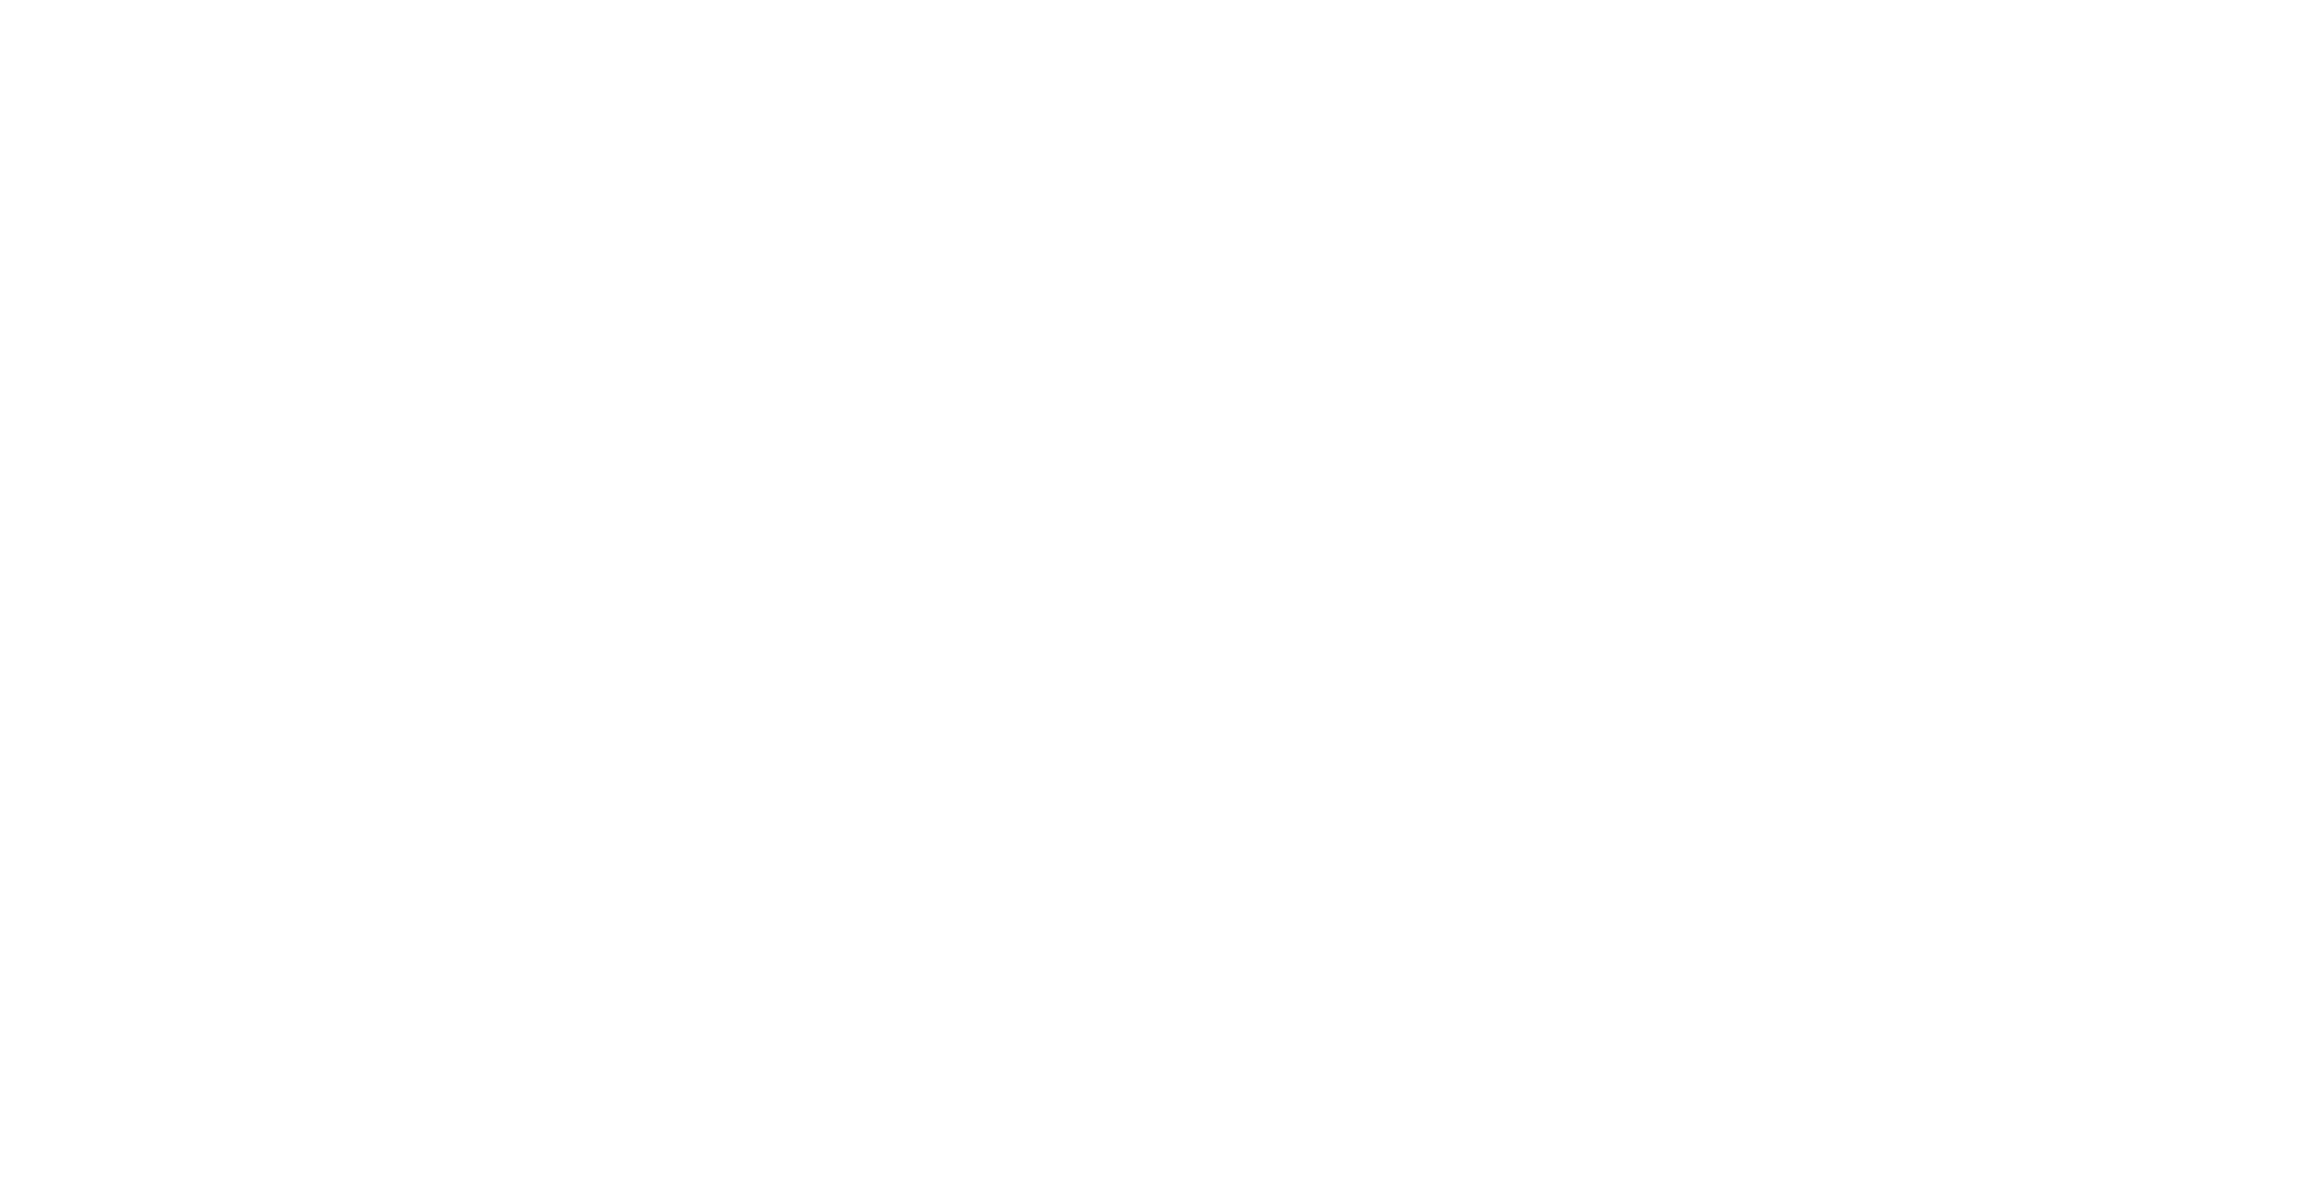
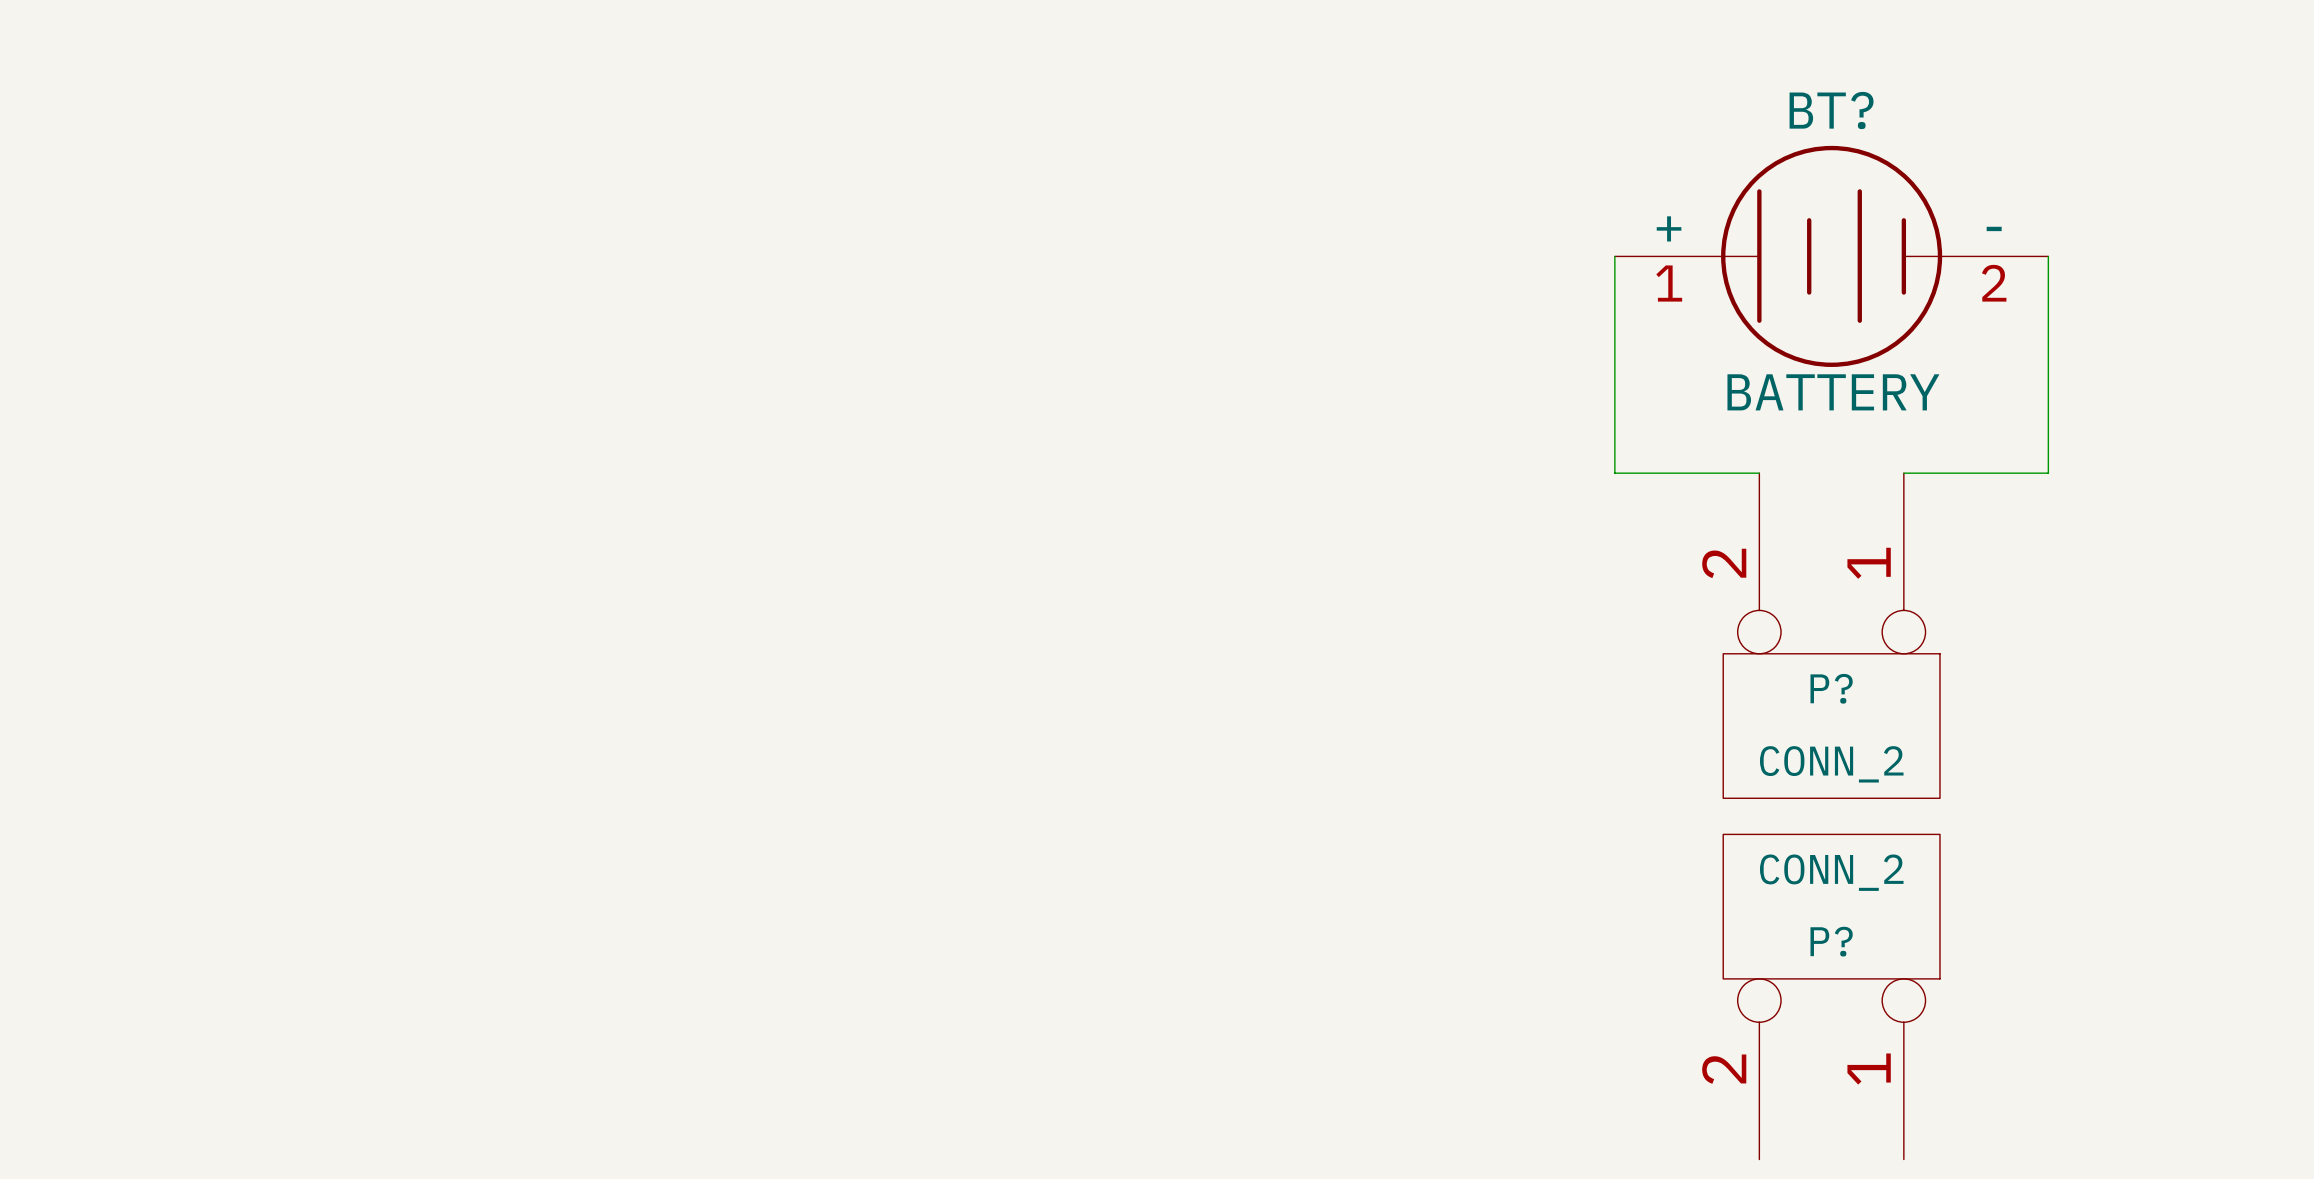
wire: none -> (1614, 256) (1614, 473) (1759, 473)
BT?: none -> BATTERY (1831, 256)
wire: none -> (2048, 256) (2048, 473) (1903, 473)
P?: none -> CONN_2 (1831, 635)
P?: none -> CONN_2 (1831, 996)

